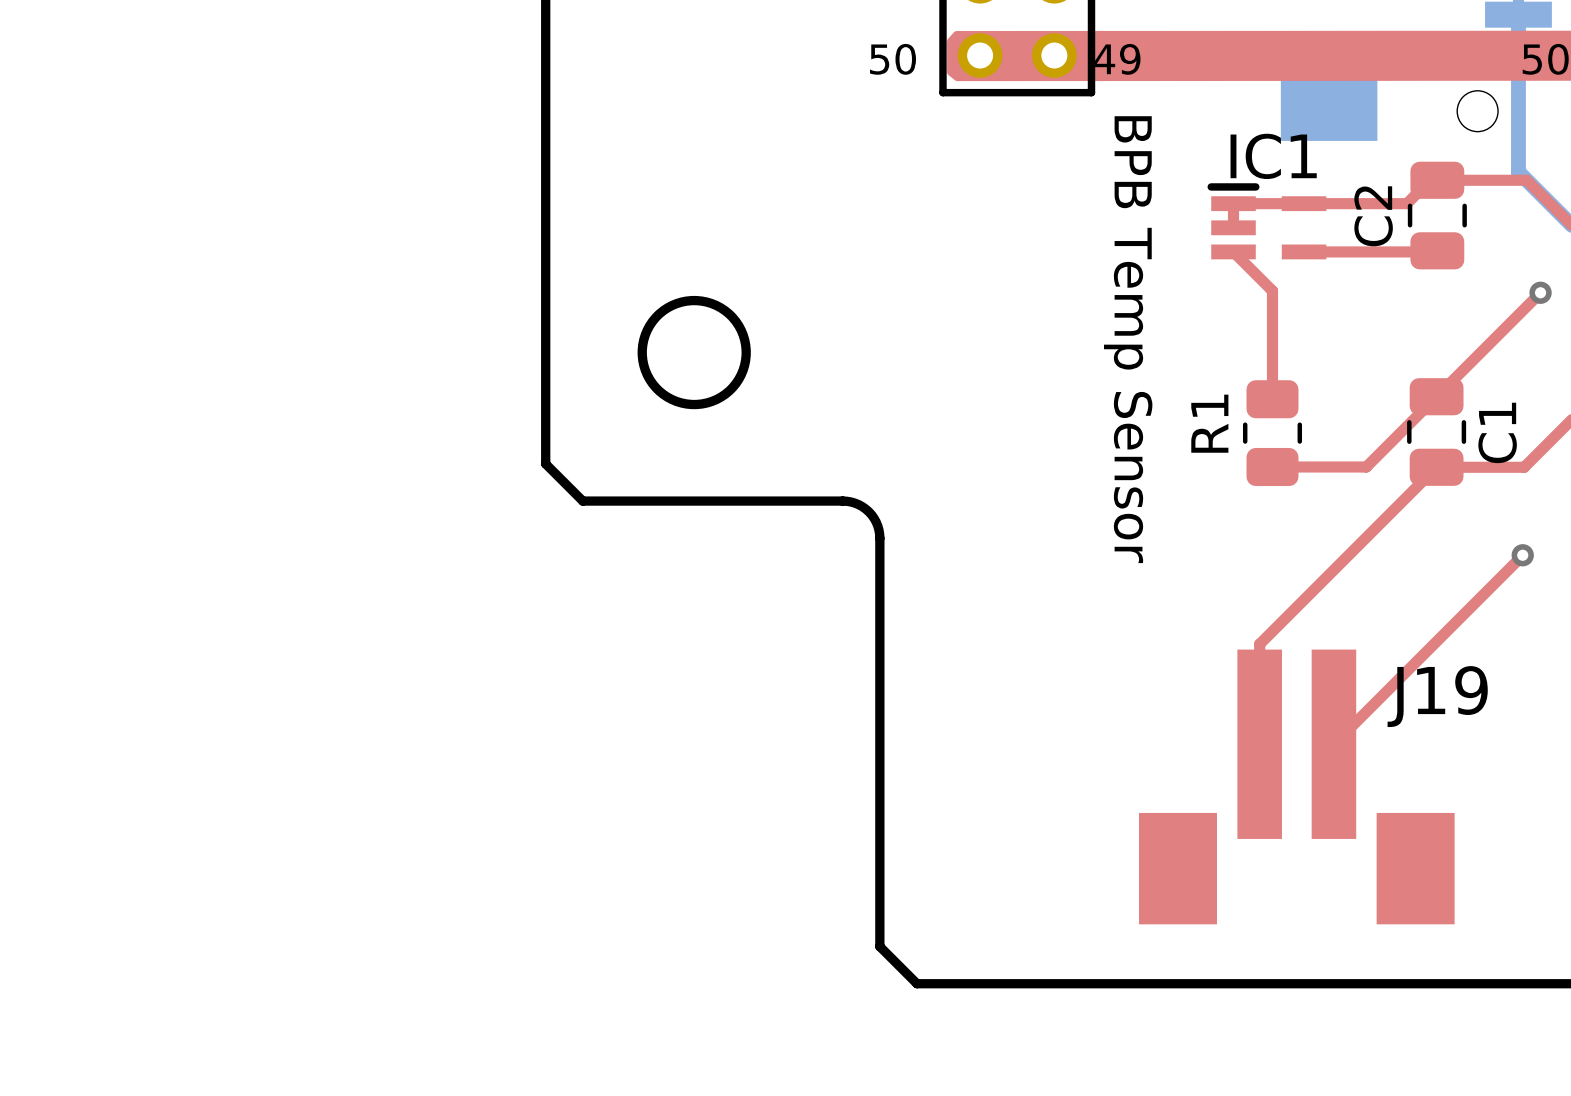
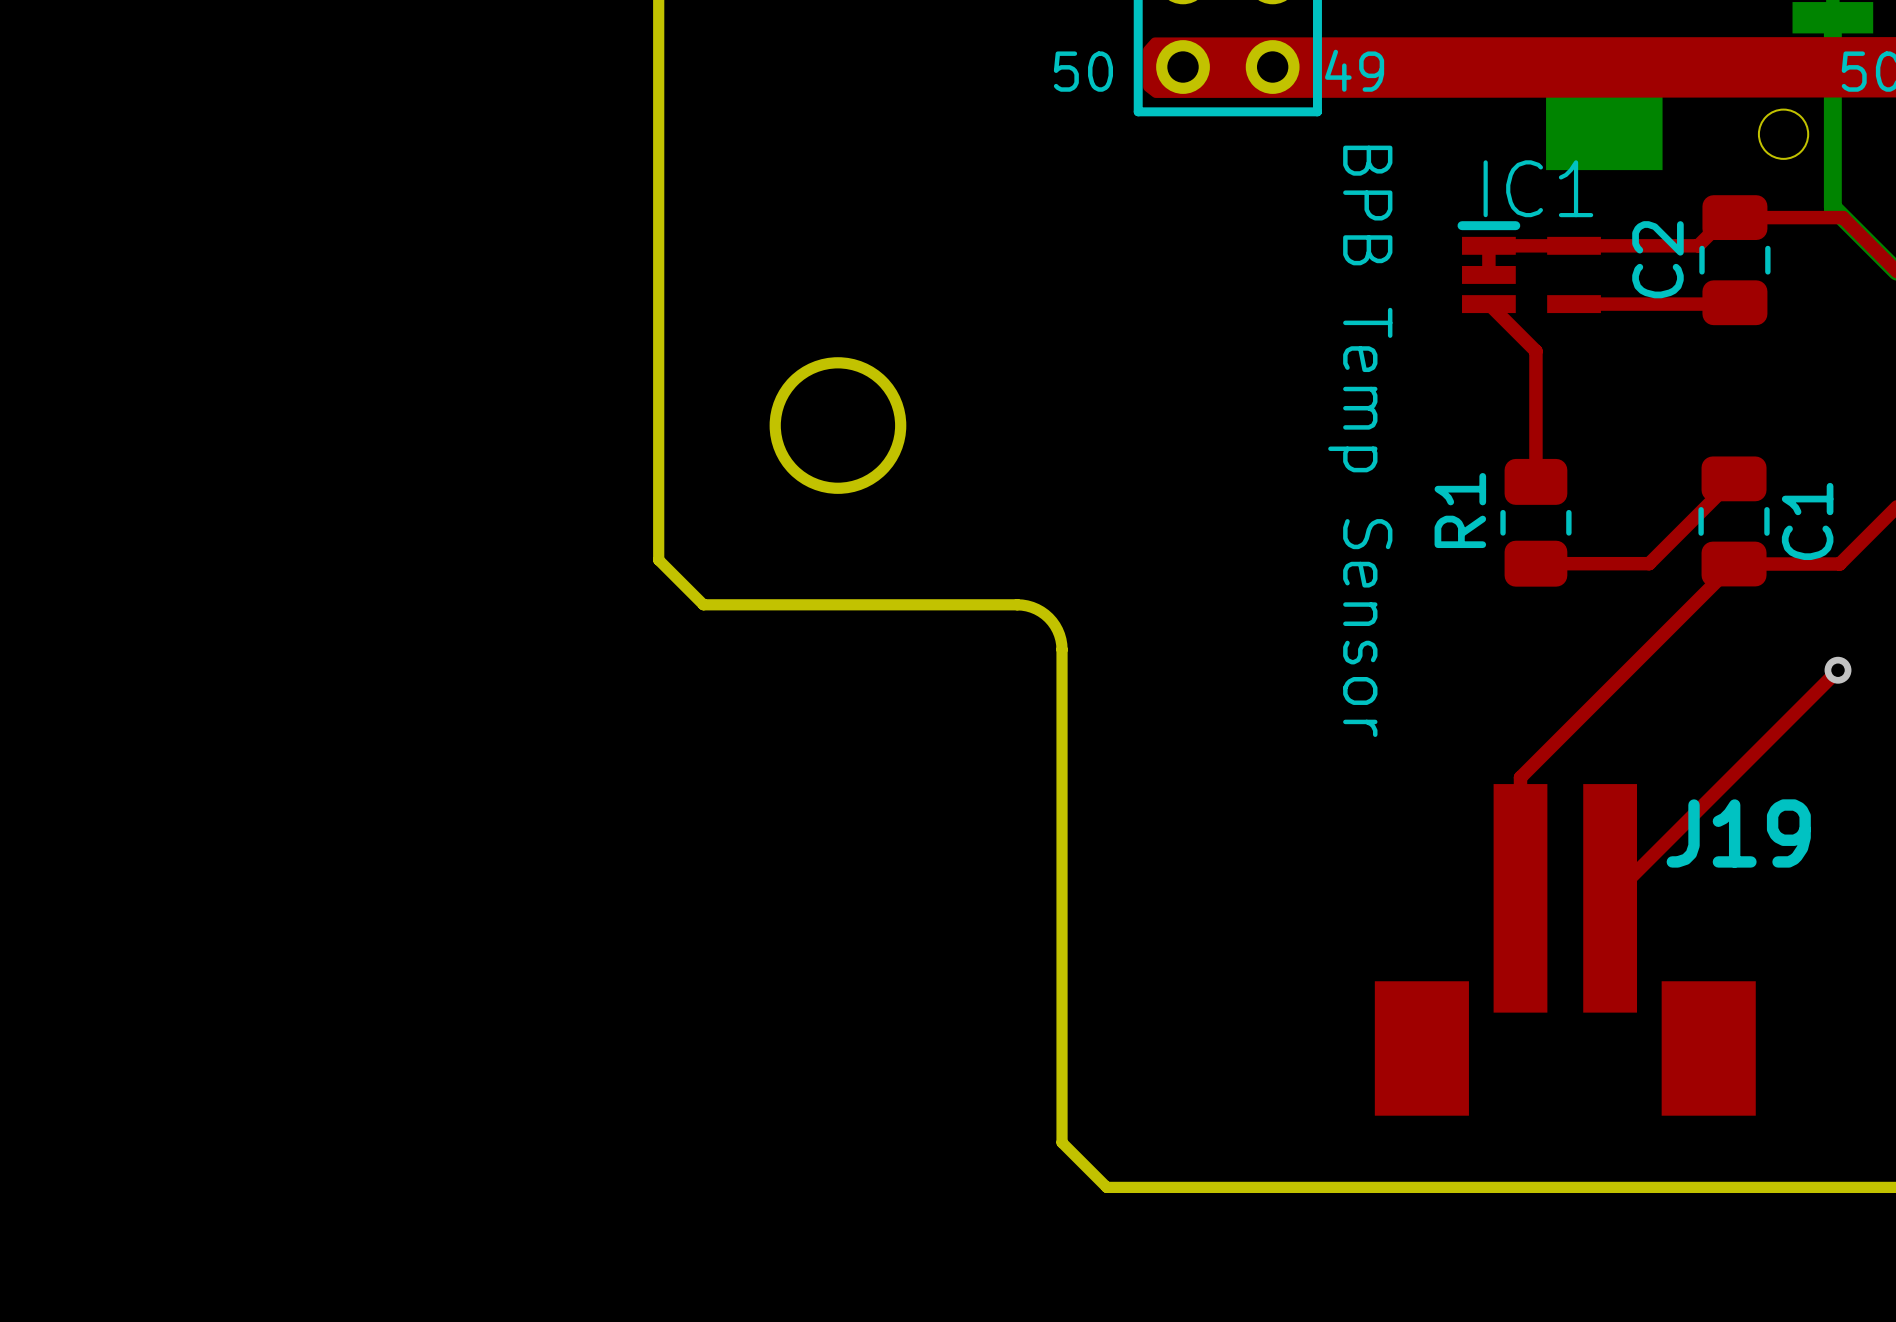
top track: (1540, 292) (1436, 396) -> none
via: (1540, 292) -> none

